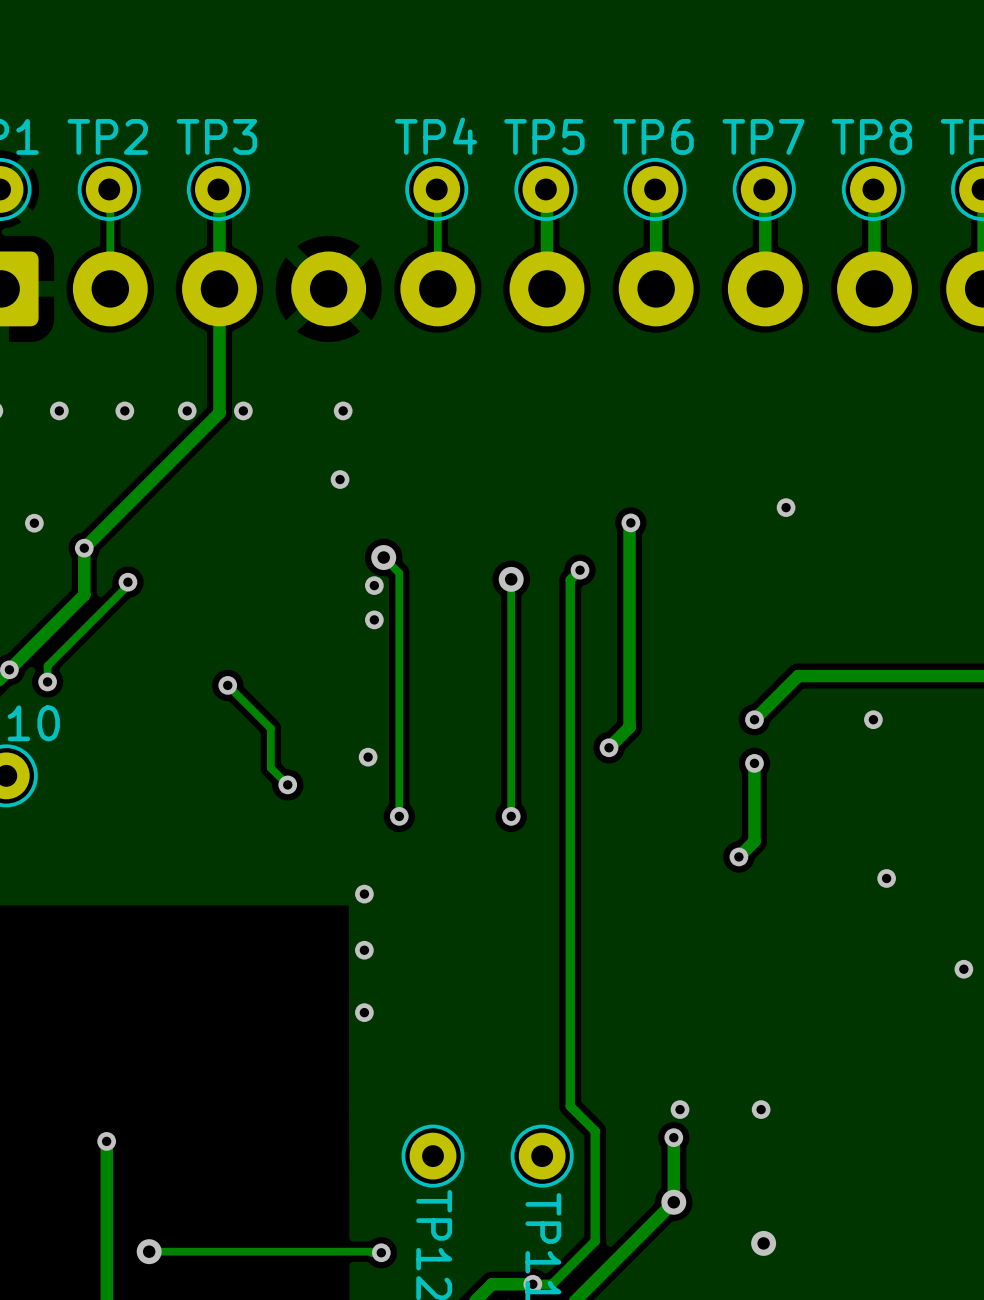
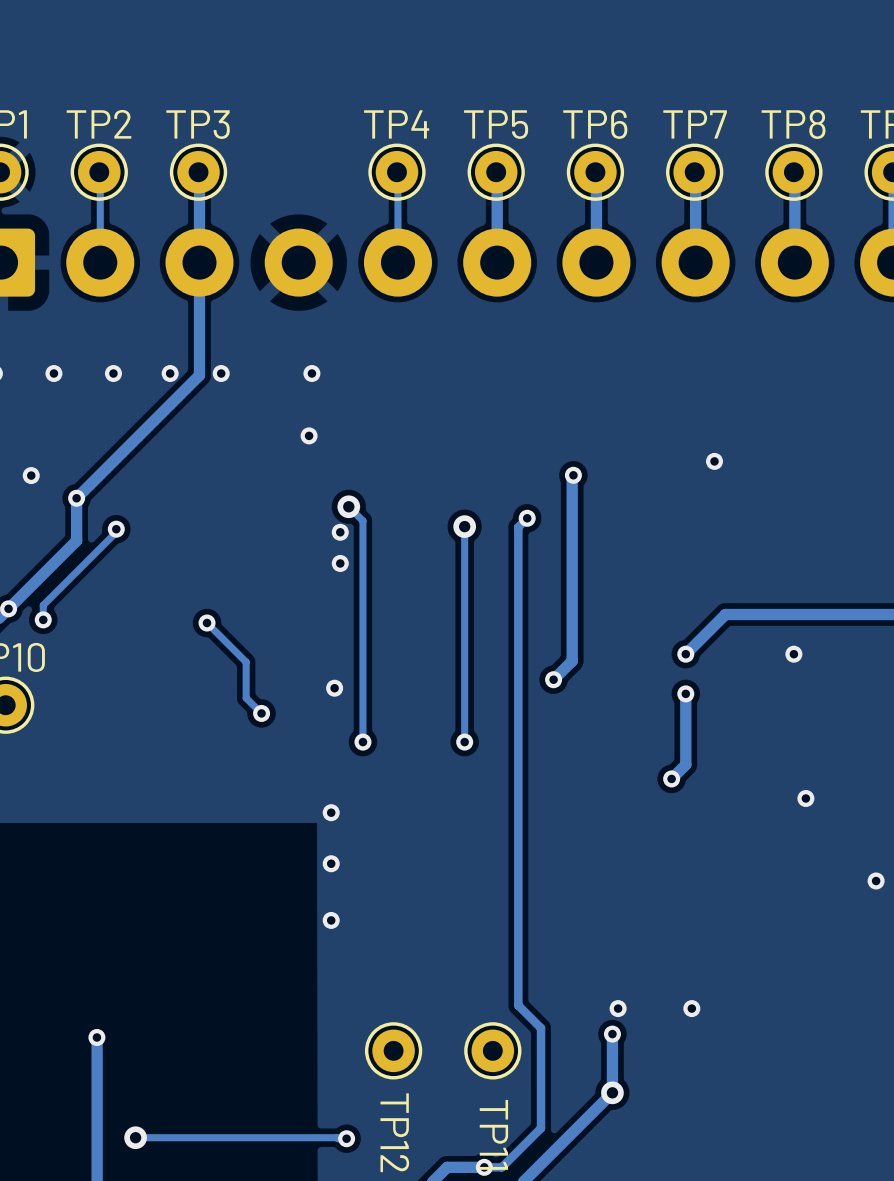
via: (763, 1243) -> none

